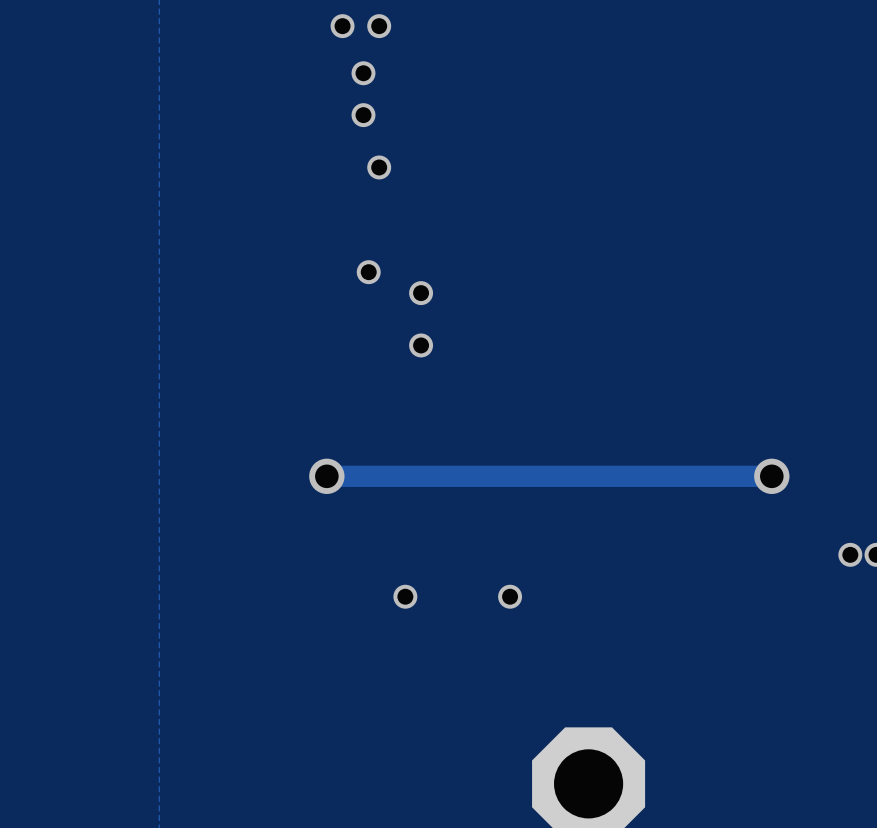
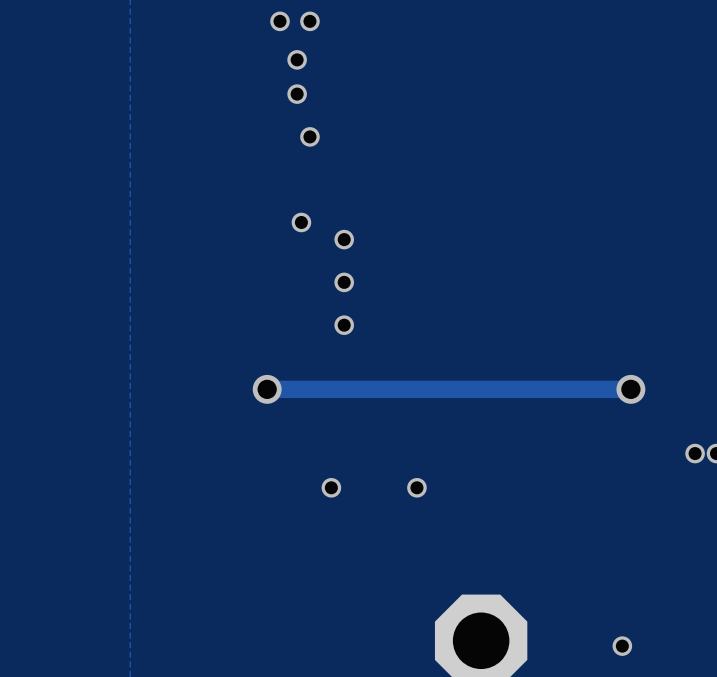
via: none -> (344, 325)
via: none -> (622, 646)

